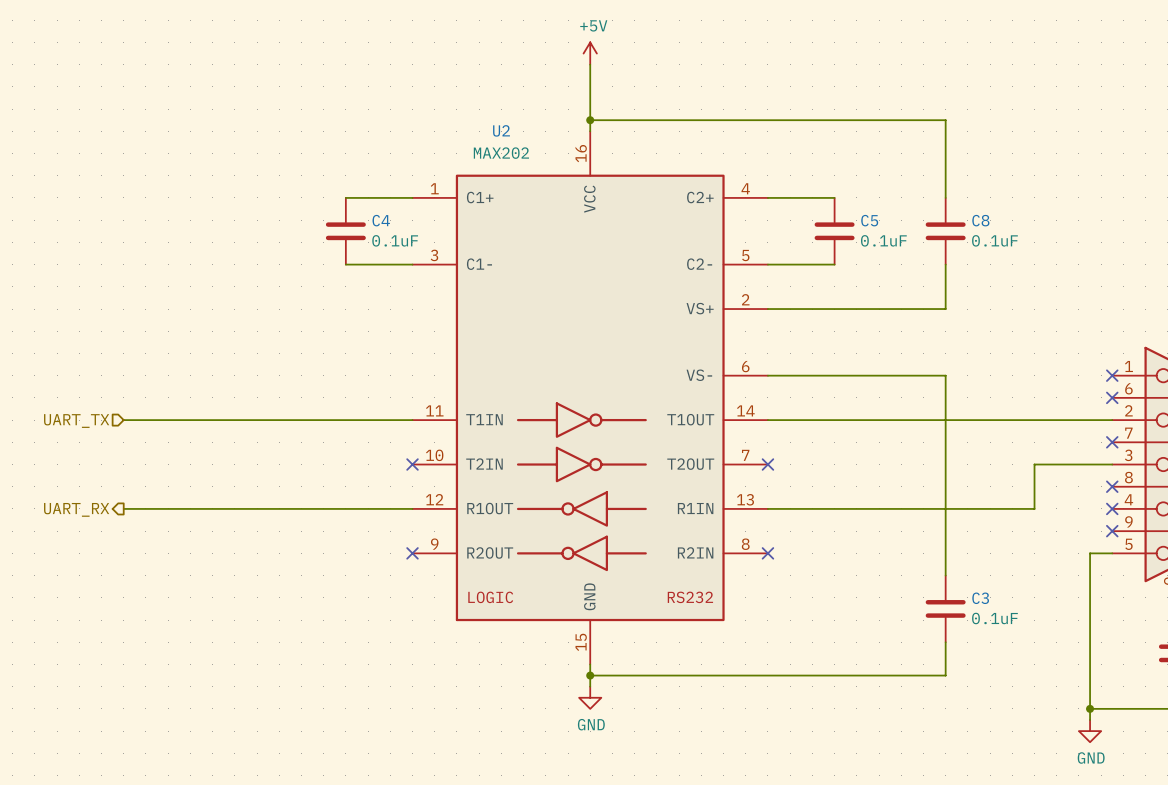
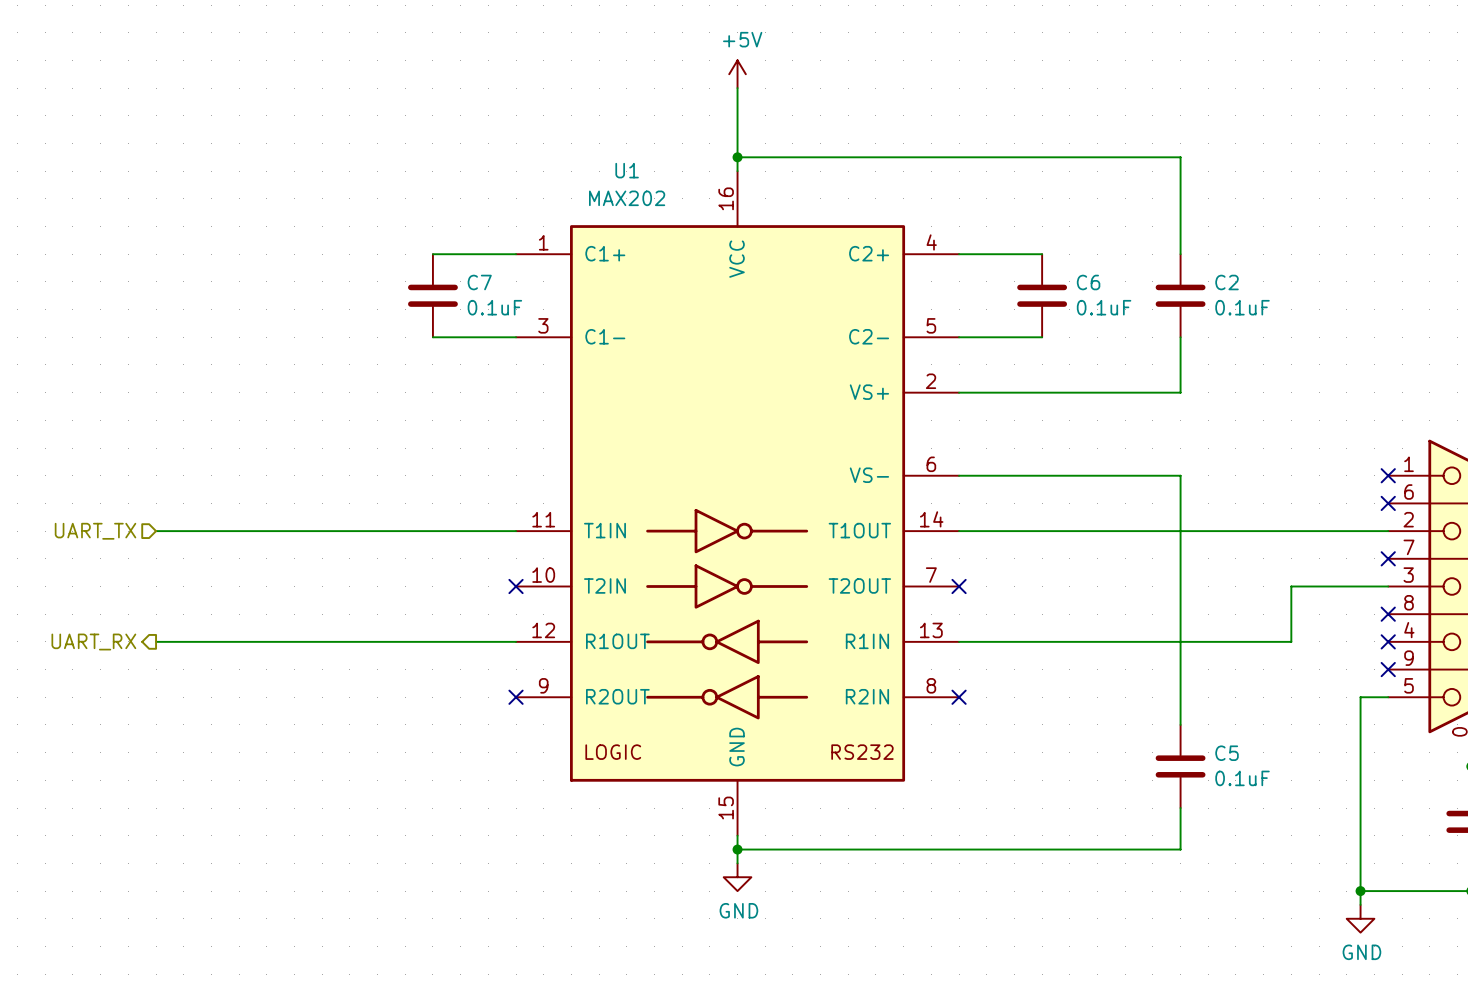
U2 name: U2 (501, 130) -> U1 (627, 170)
C4 name: C4 (381, 220) -> C7 (479, 282)
C5 name: C5 (869, 220) -> C6 (1088, 282)
C8 name: C8 (980, 220) -> C2 (1227, 282)
C3 name: C3 (980, 598) -> C5 (1227, 753)

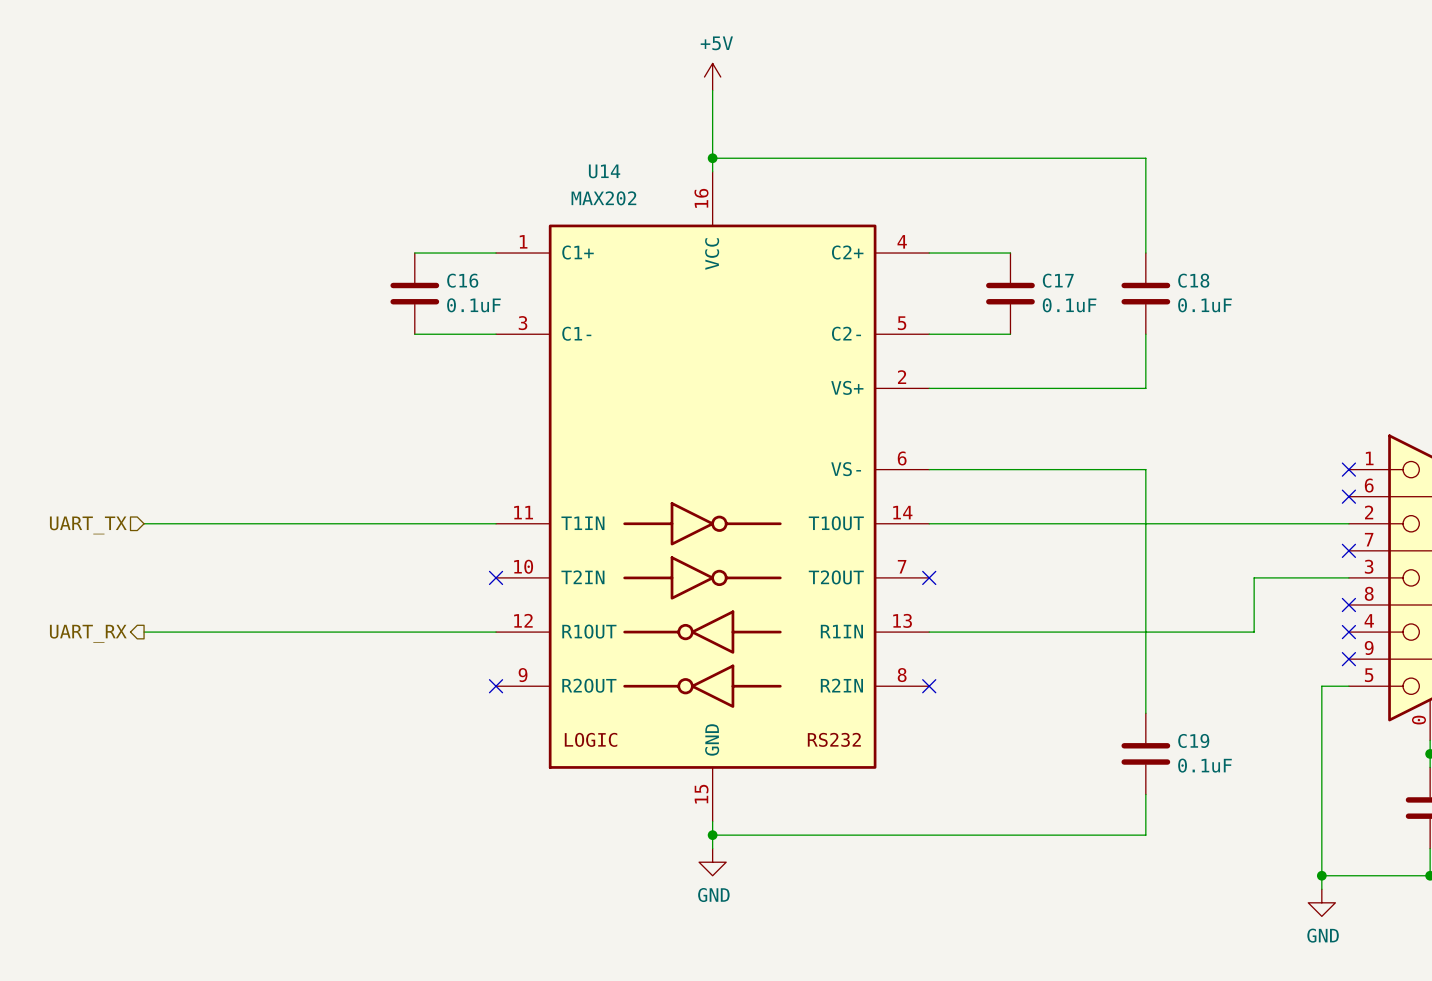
U1 name: U1 (627, 170) -> U14 (604, 171)
C7 name: C7 (479, 282) -> C16 (462, 280)
C6 name: C6 (1088, 282) -> C17 (1058, 280)
C2 name: C2 (1227, 282) -> C18 (1193, 280)
C5 name: C5 (1227, 753) -> C19 (1193, 740)

